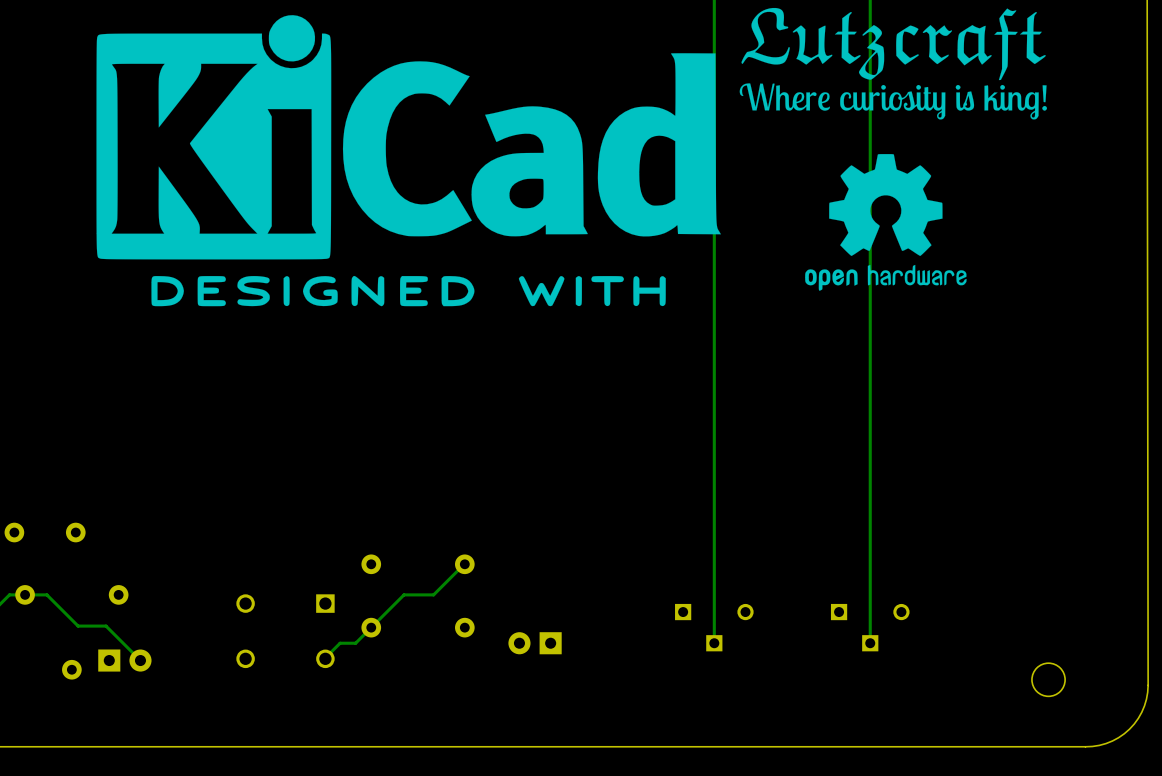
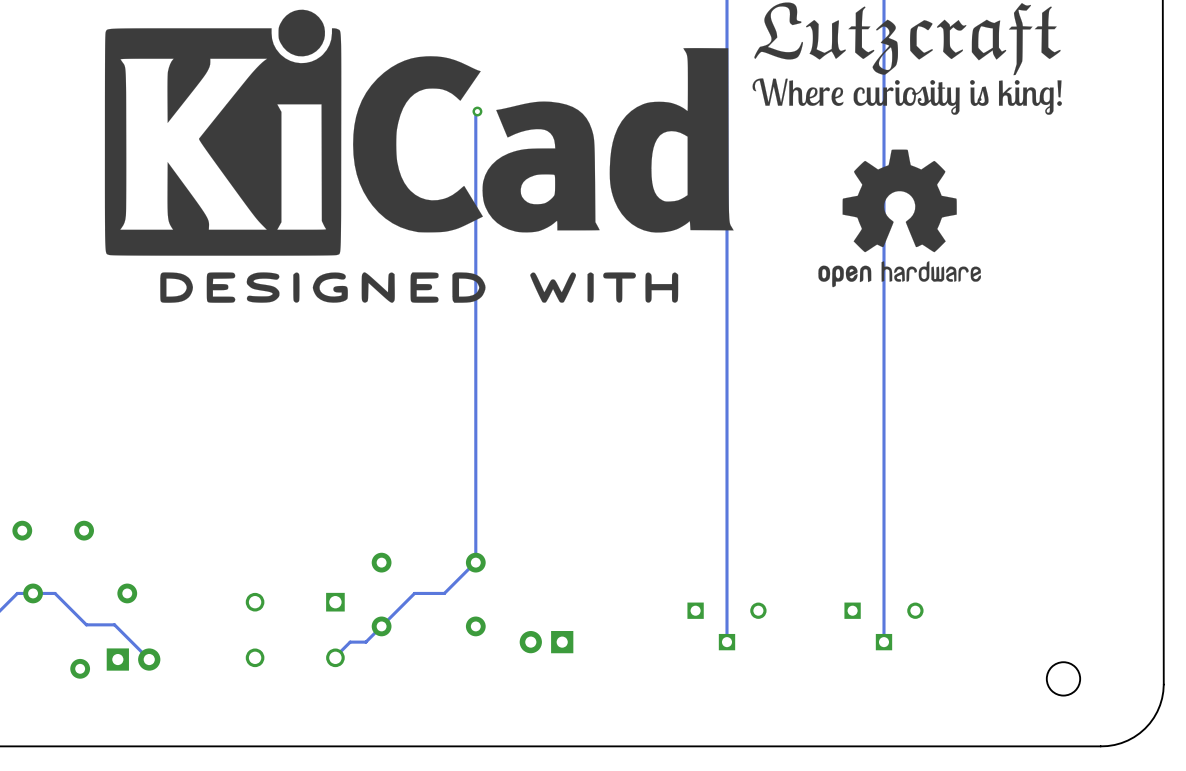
track: none -> (477, 111) (475, 113) (475, 562)
via: none -> (477, 111)

